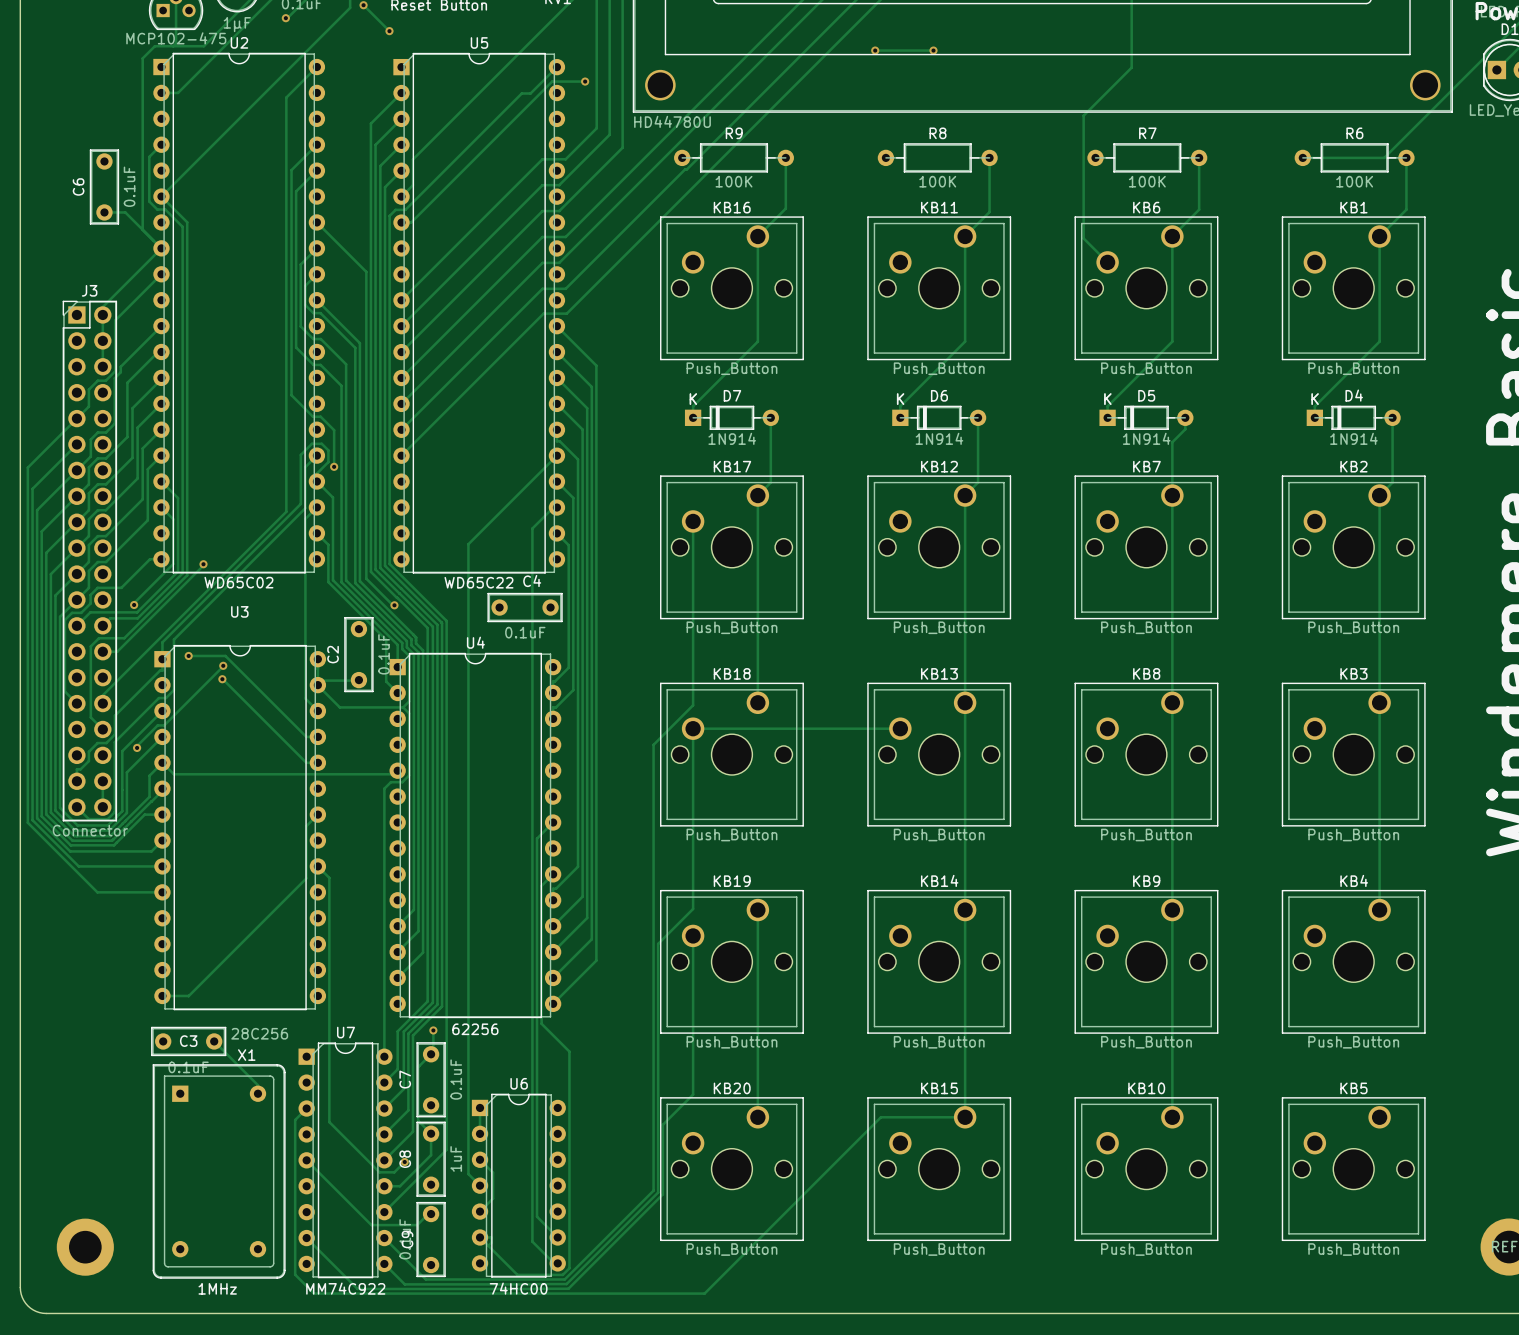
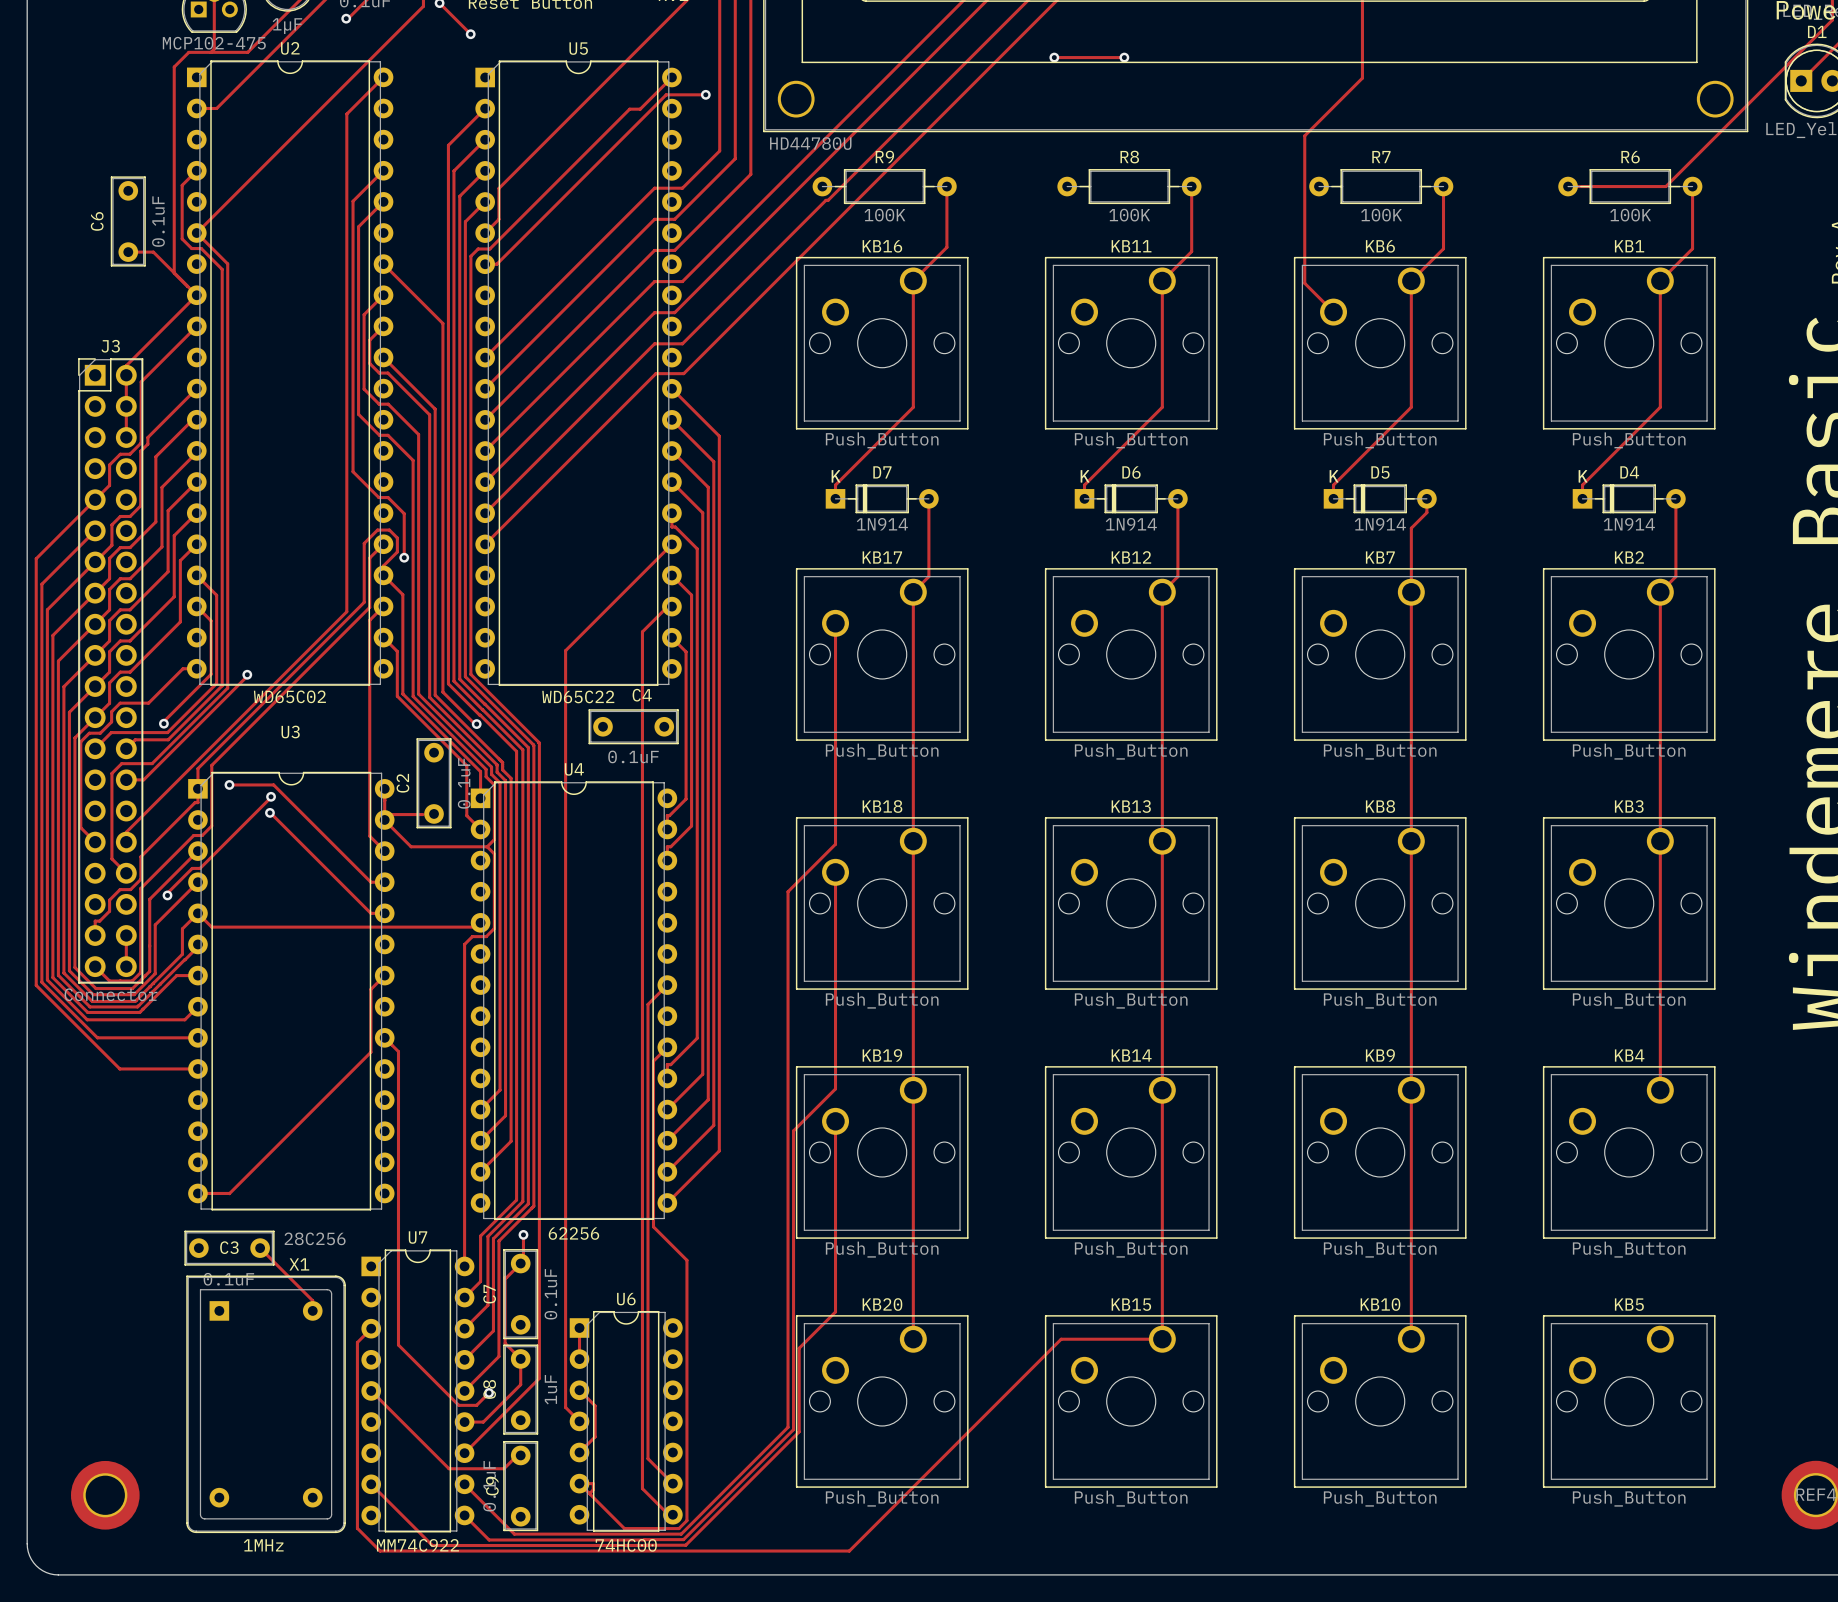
track: none -> (913, 841) (913, 1090)
track: (693, 728) (900, 728) -> none

